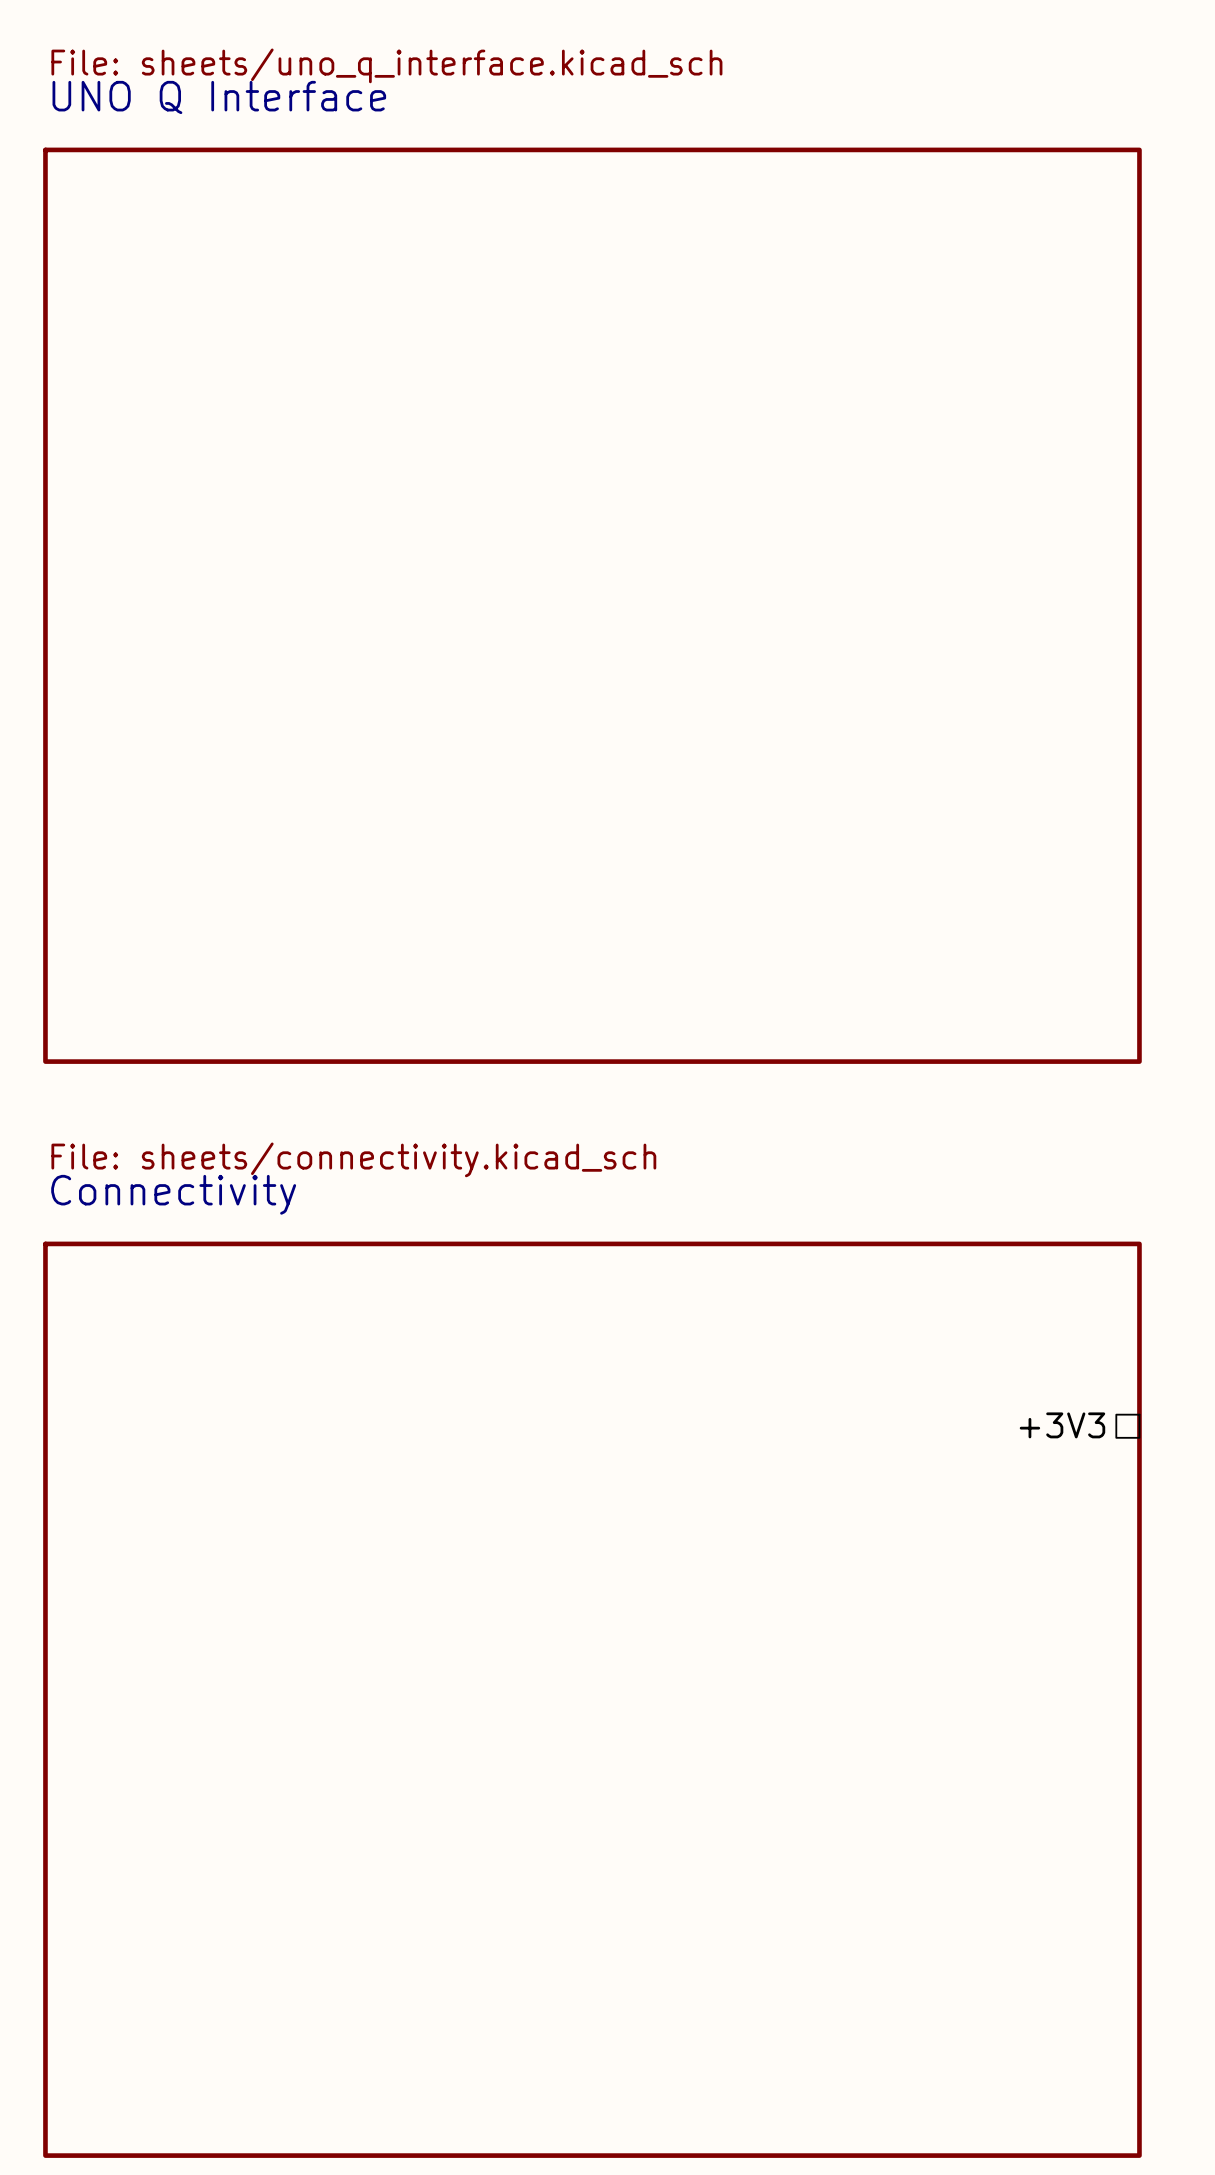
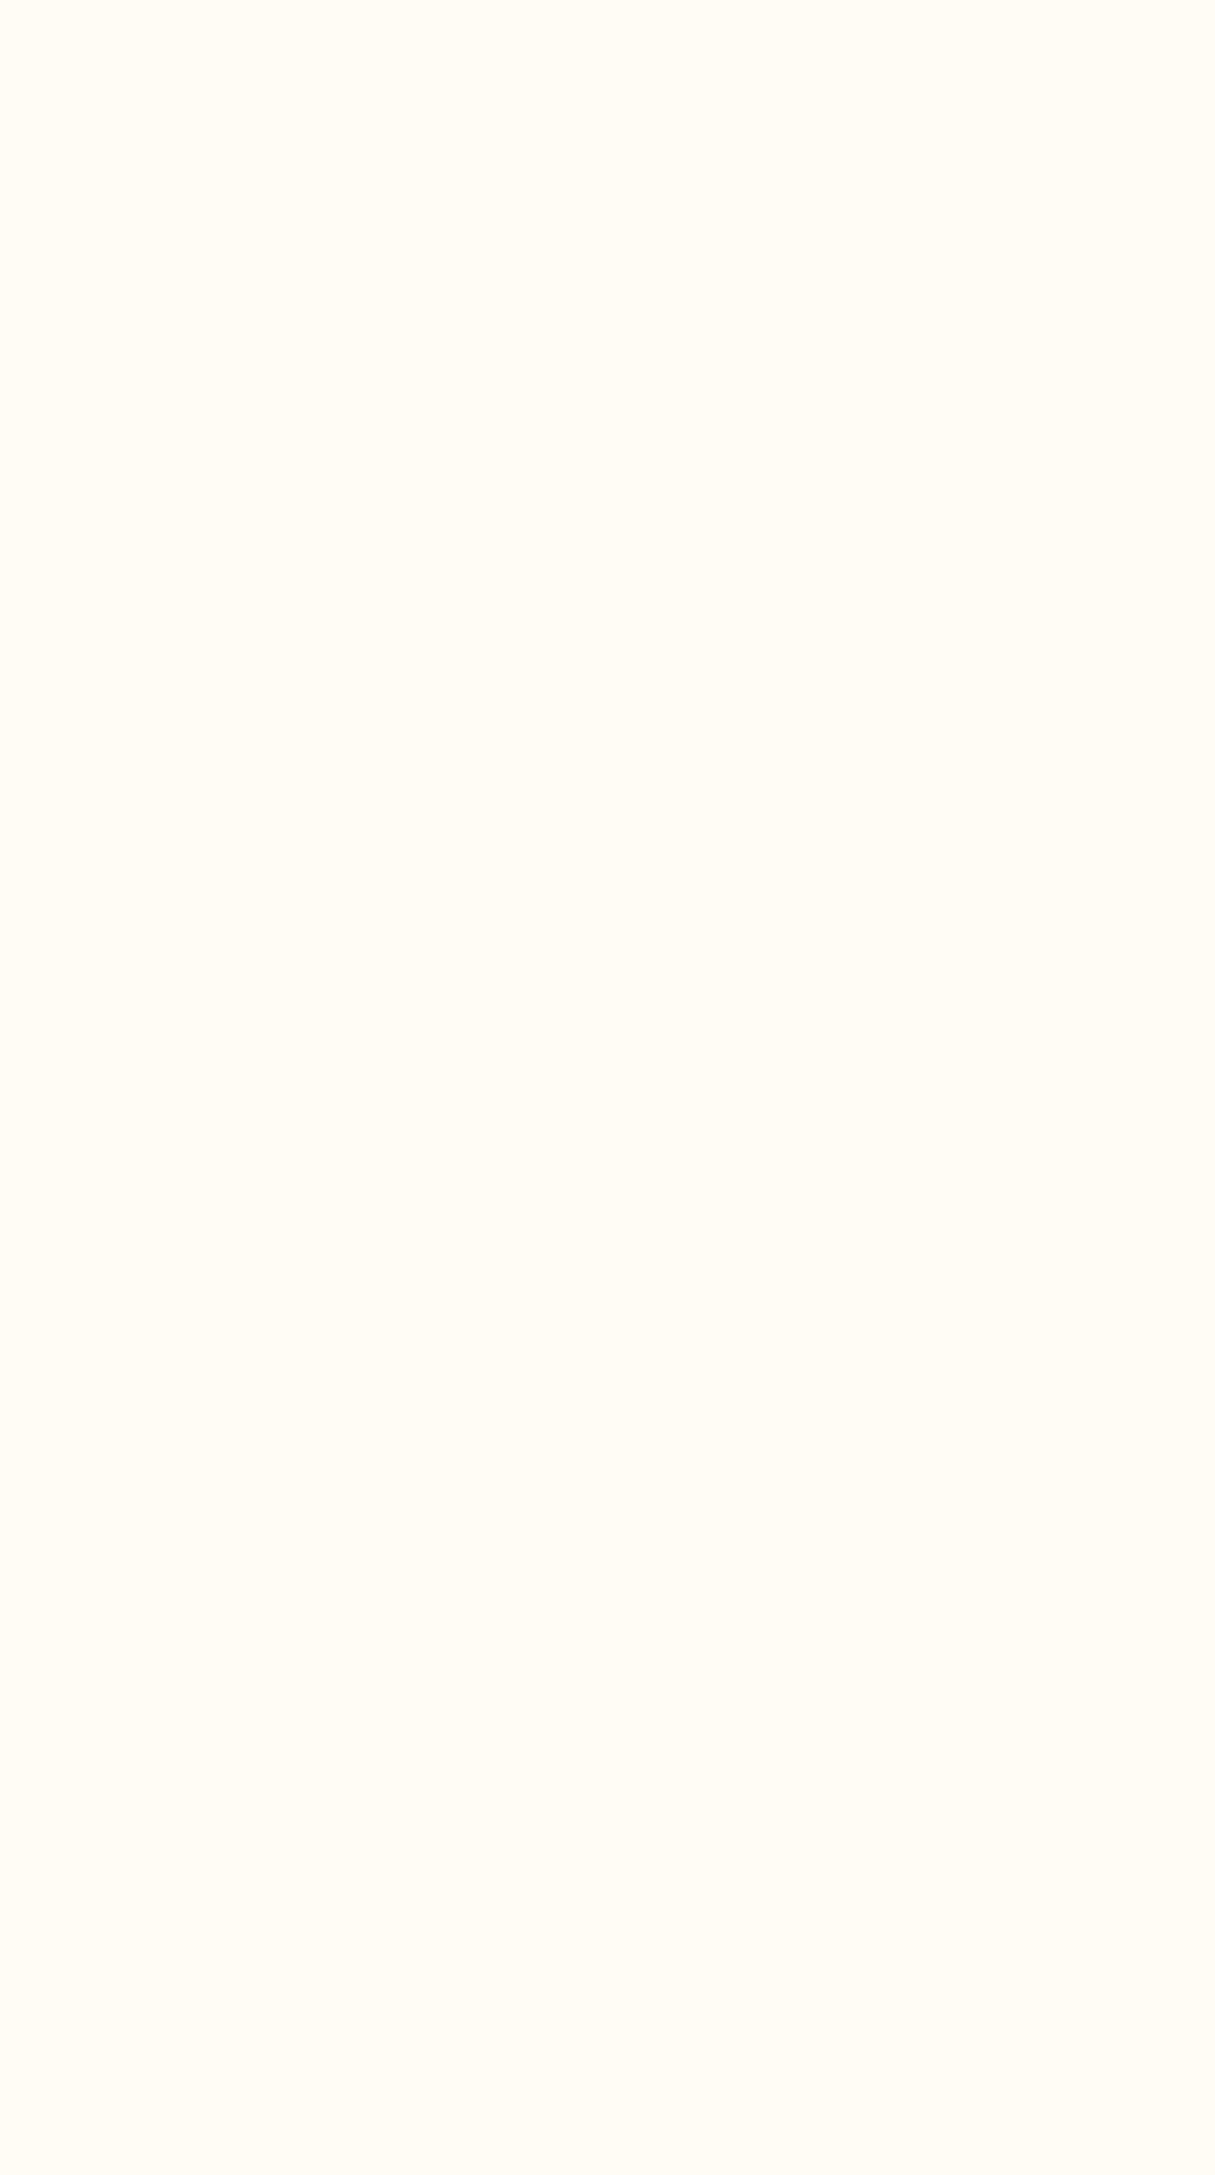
sheet UNO Q Interface: File: sheets/uno_q_interface.kicad_sch (592, 605) -> none
sheet pin: +3V3 (1062, 1425) -> none
sheet Connectivity: File: sheets/connectivity.kicad_sch (592, 1699) -> none

